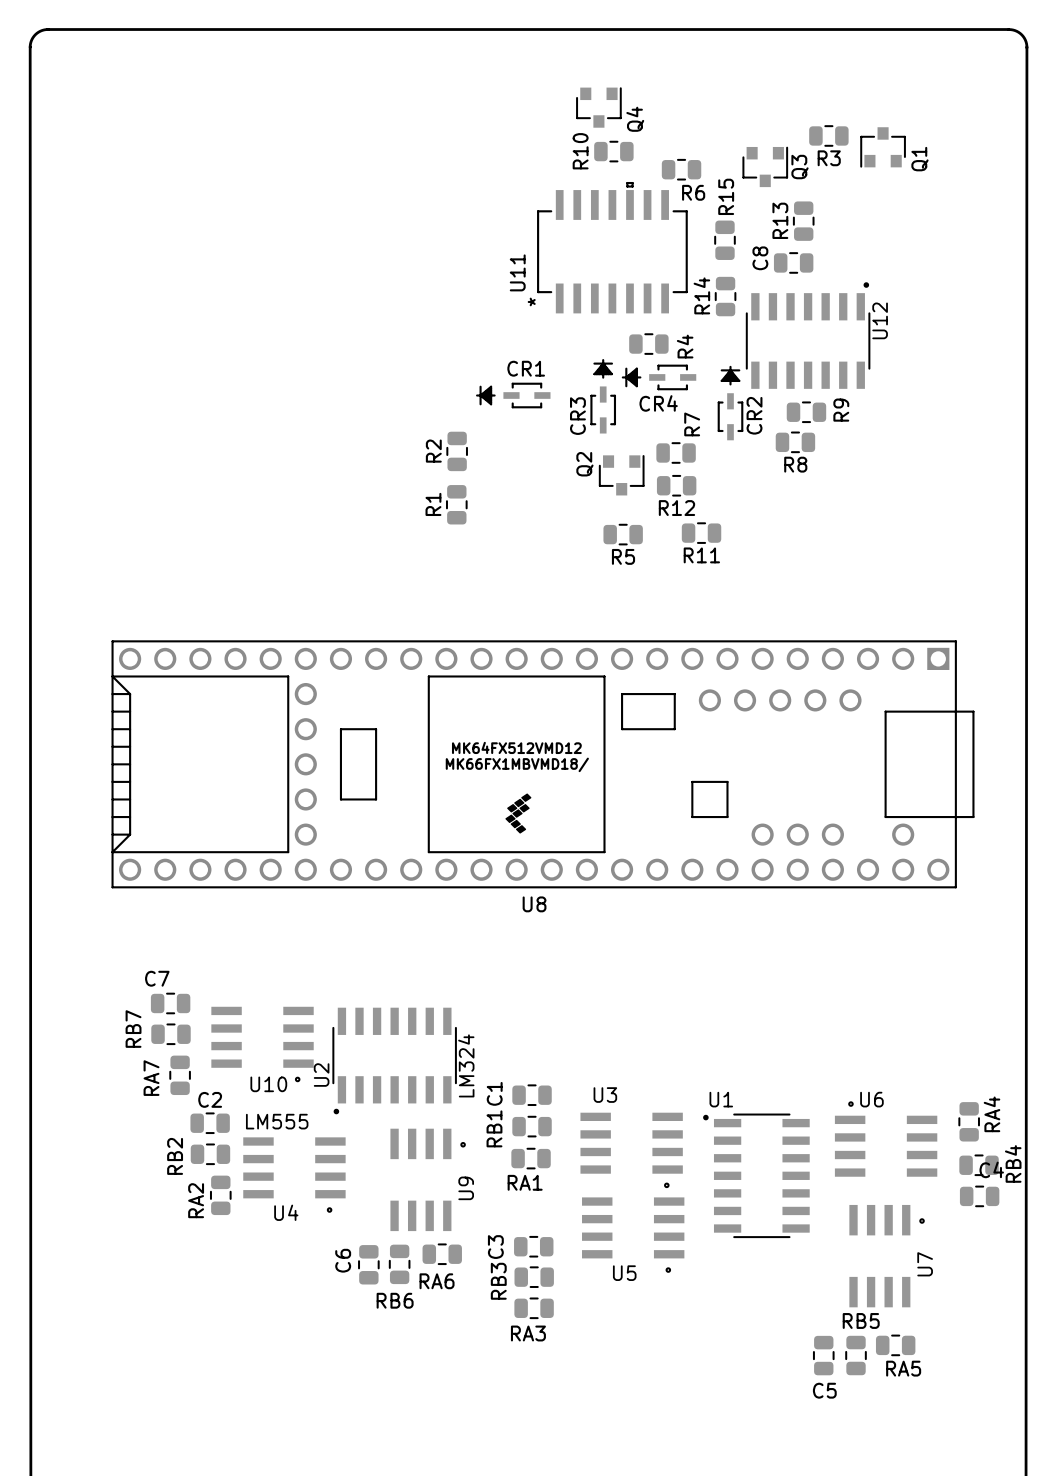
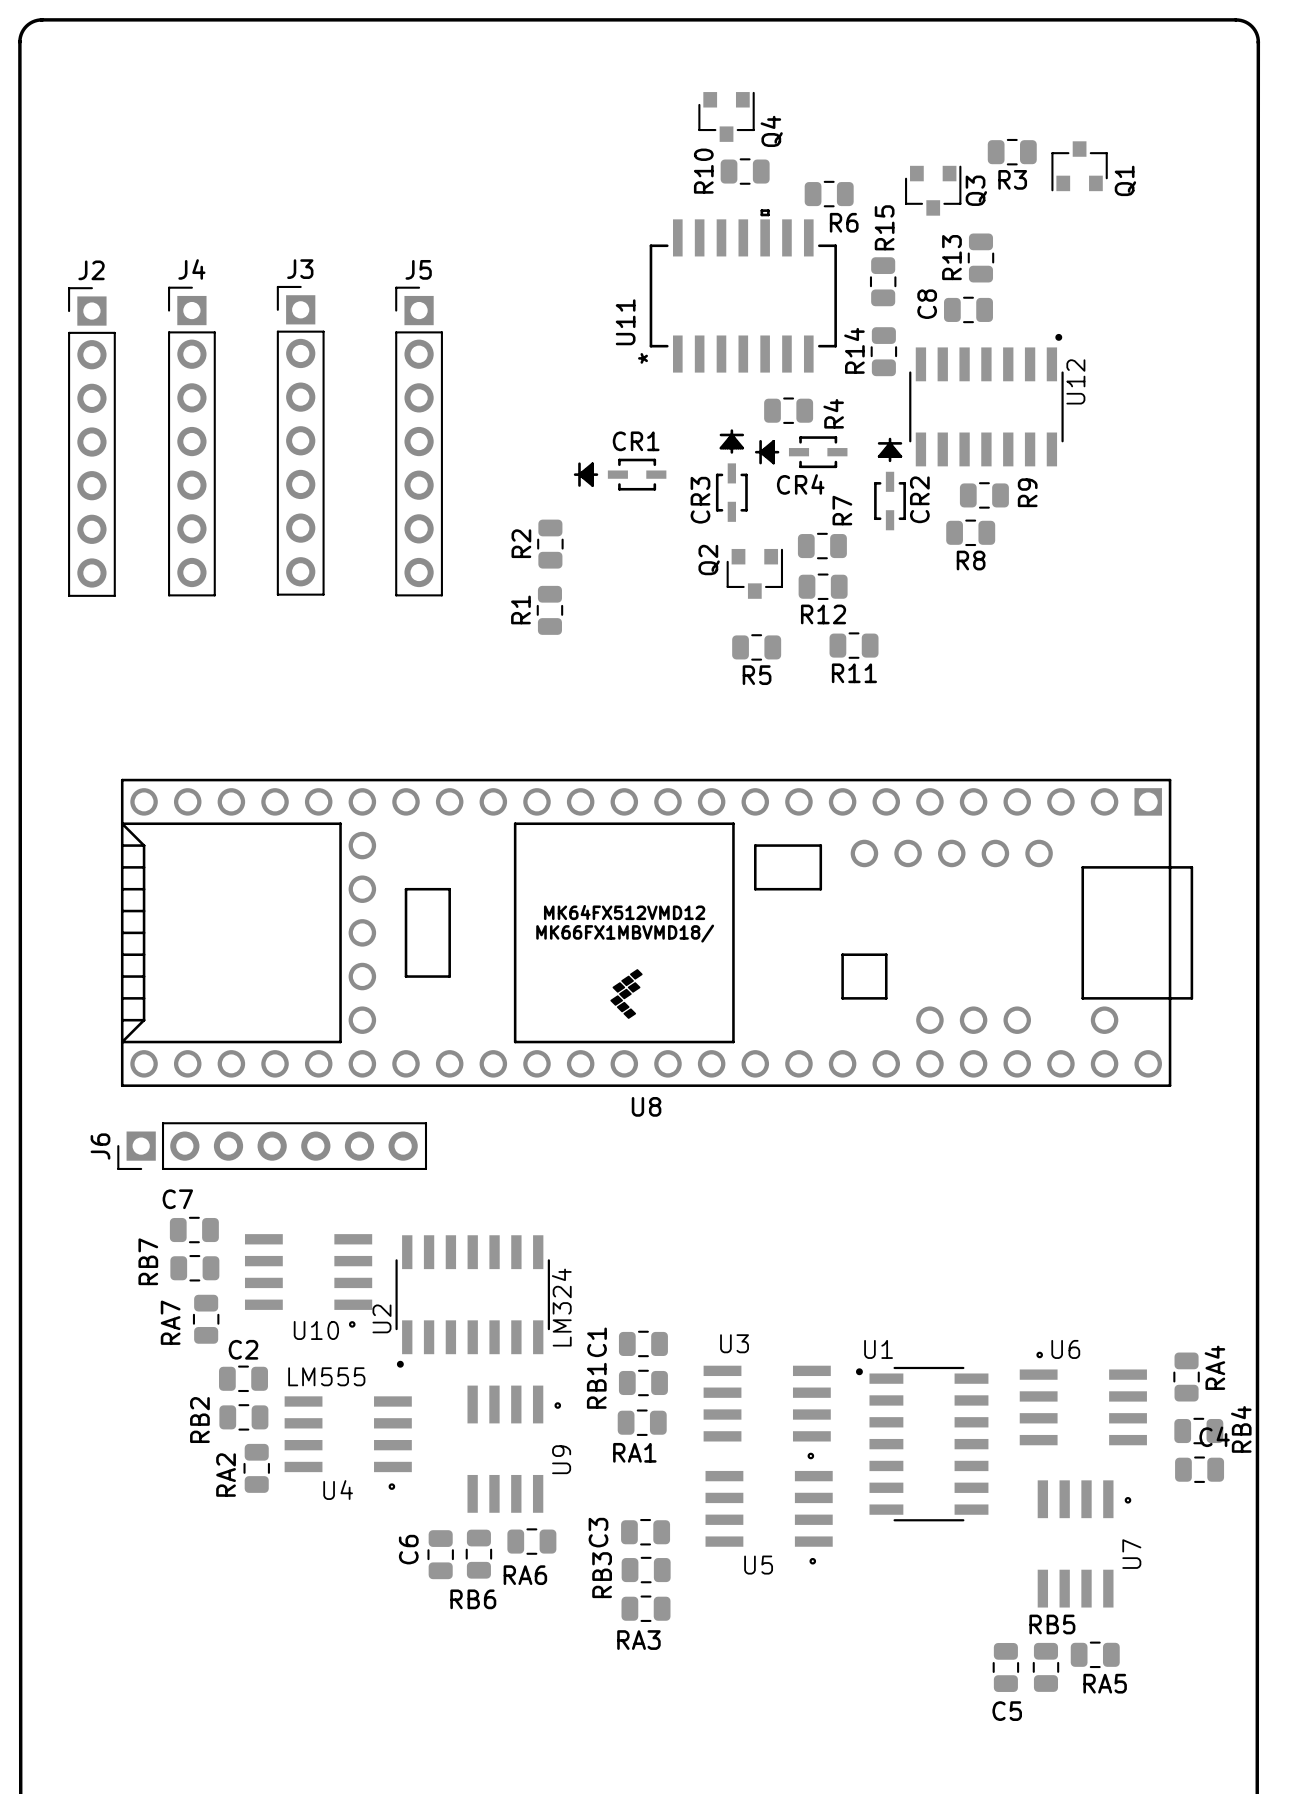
J4: none -> (191, 441)
J3: none -> (300, 440)
J5: none -> (419, 441)
J2: none -> (91, 442)
J6: none -> (272, 1146)

